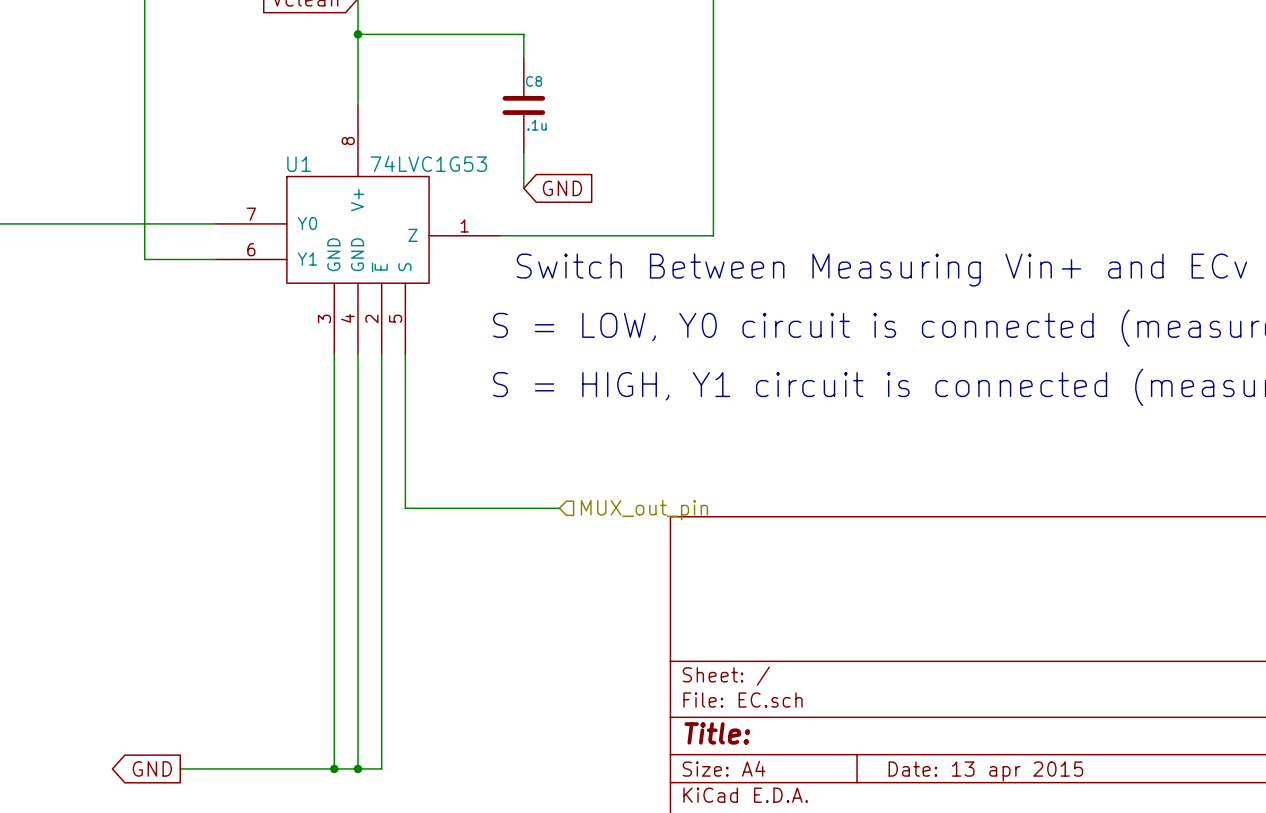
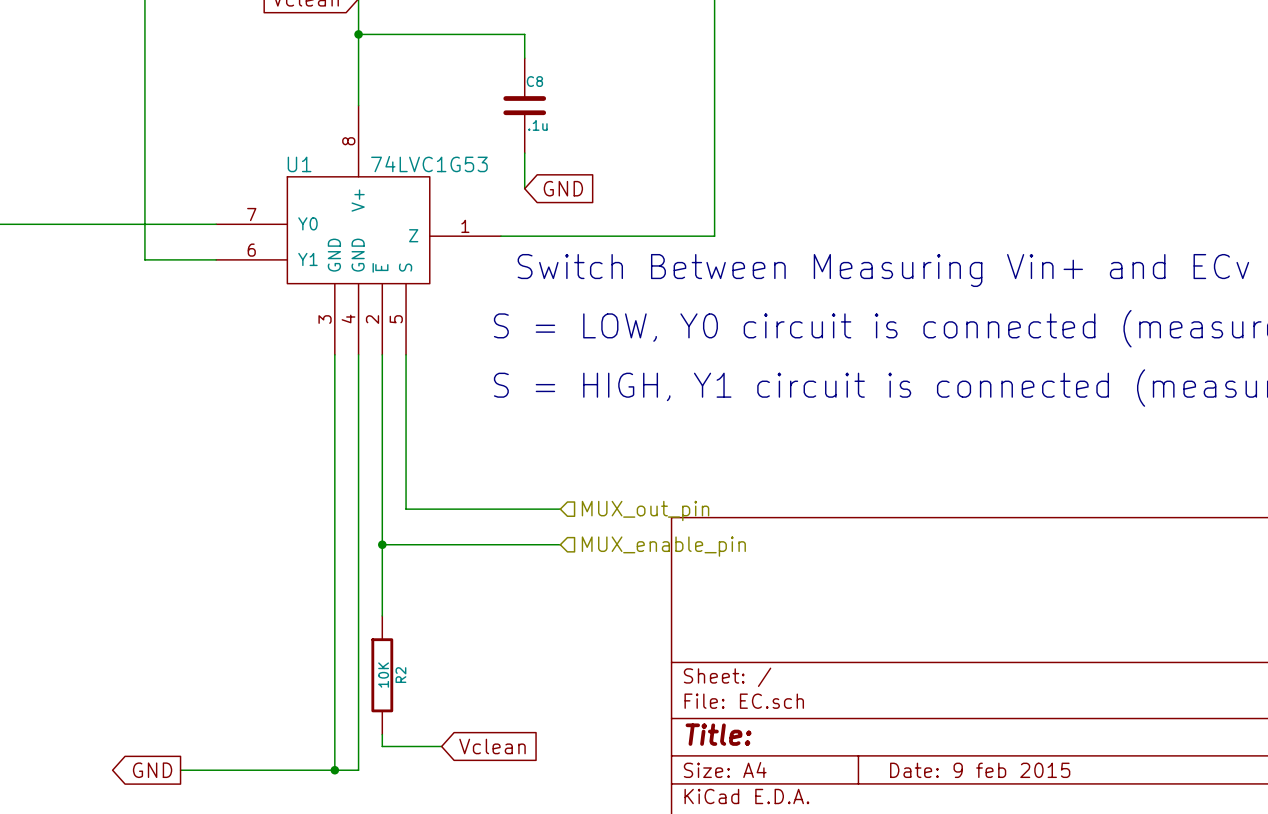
wire: none -> (382, 544) (560, 544)
junction: none -> (382, 544)
hierarchical label: none -> MUX_enable_pin (663, 546)
wire: (381, 614) (381, 733) -> none
R2: none -> 10K (382, 675)
wire: (381, 745) (381, 768) (357, 768) -> (382, 746) (441, 746)
global label: none -> Vclean (492, 746)
junction: (357, 768) -> none
title block: Date: 13 apr 2015 (985, 771) -> Date: 9 feb 2015 (980, 770)

